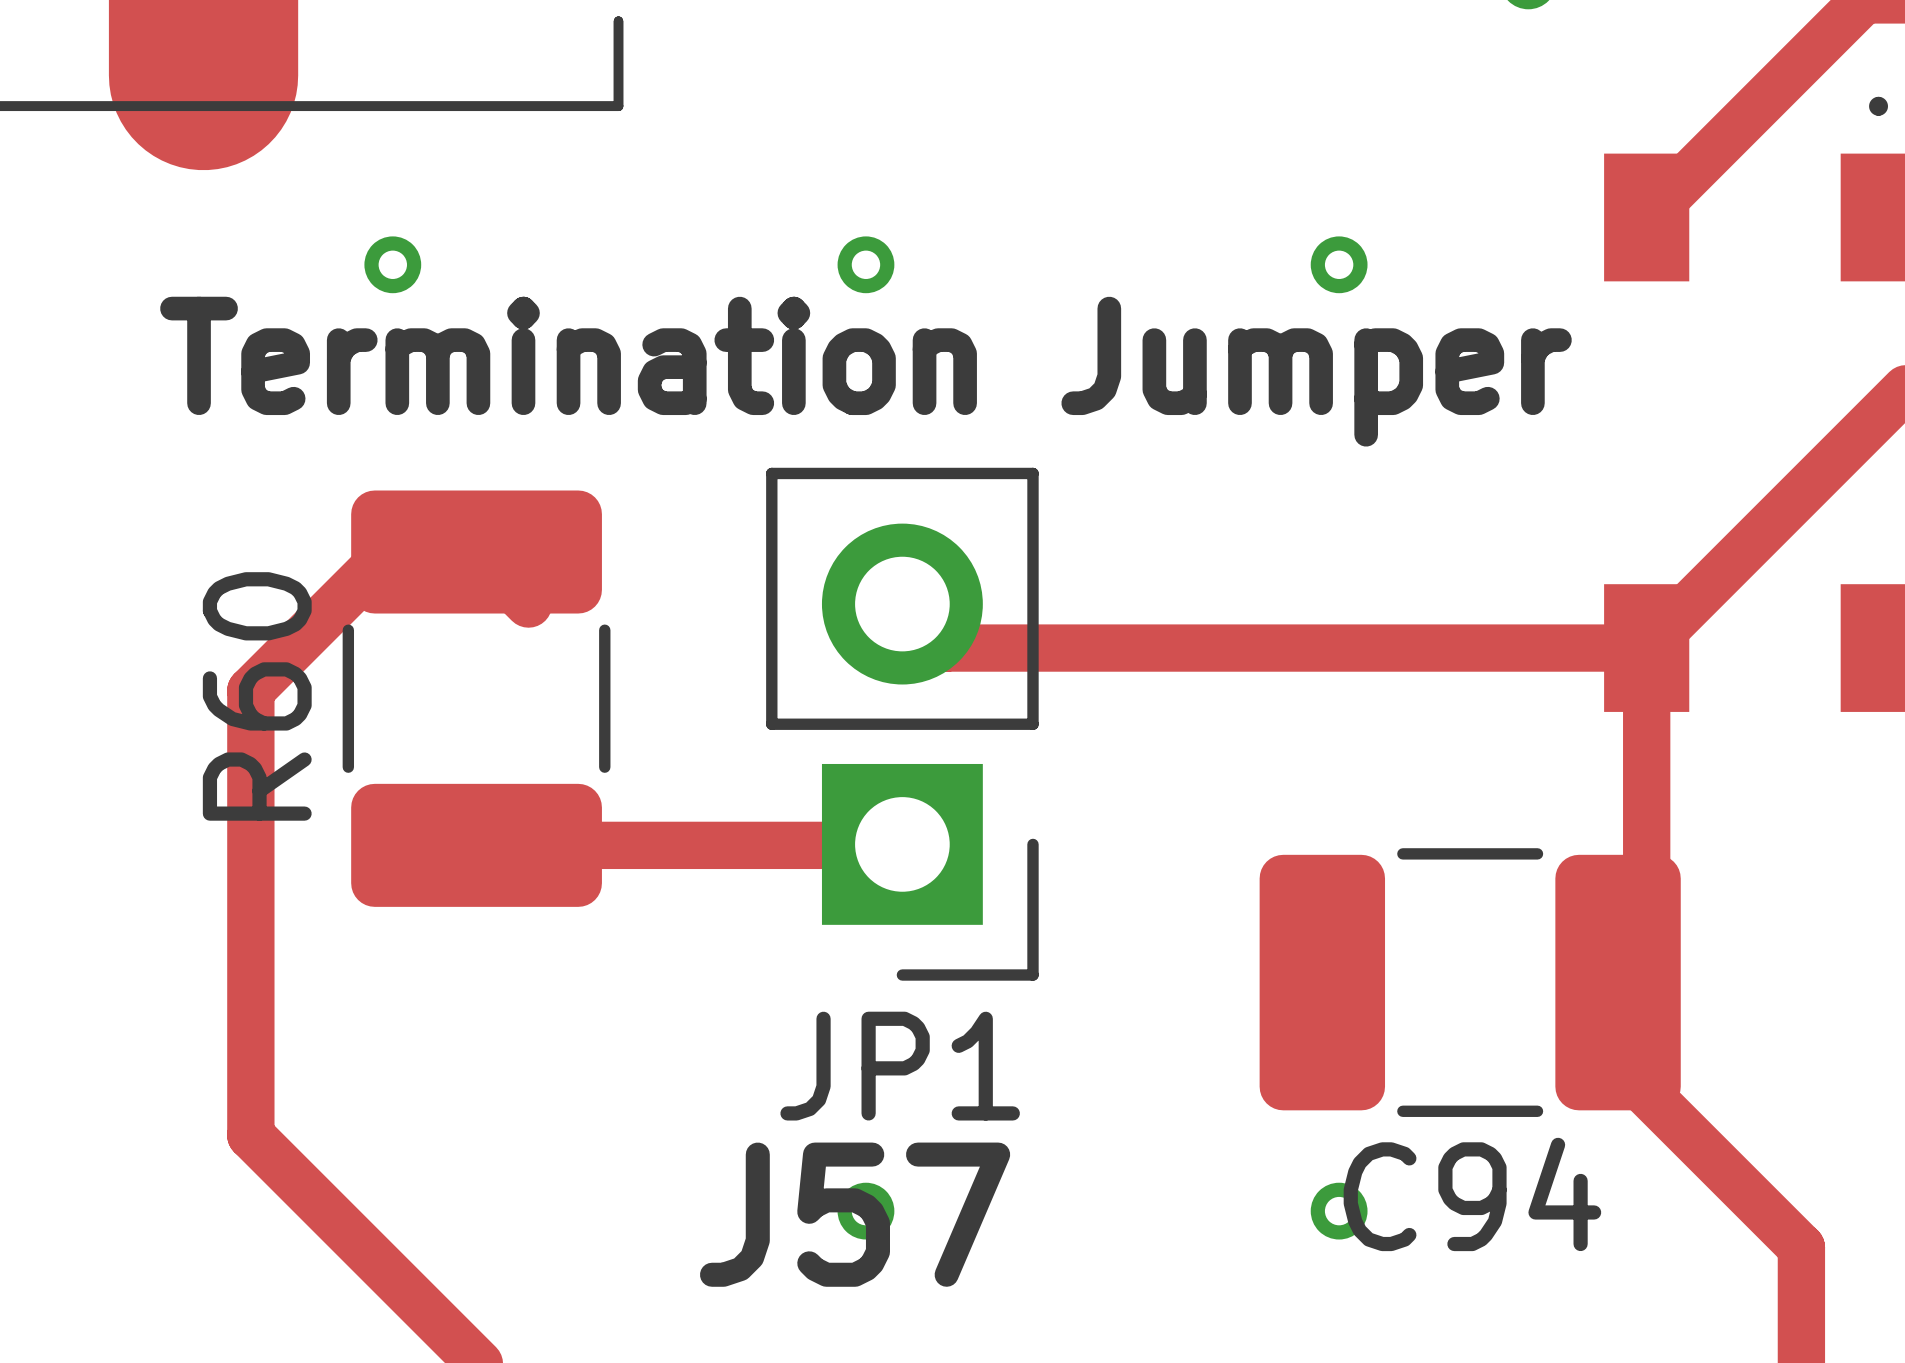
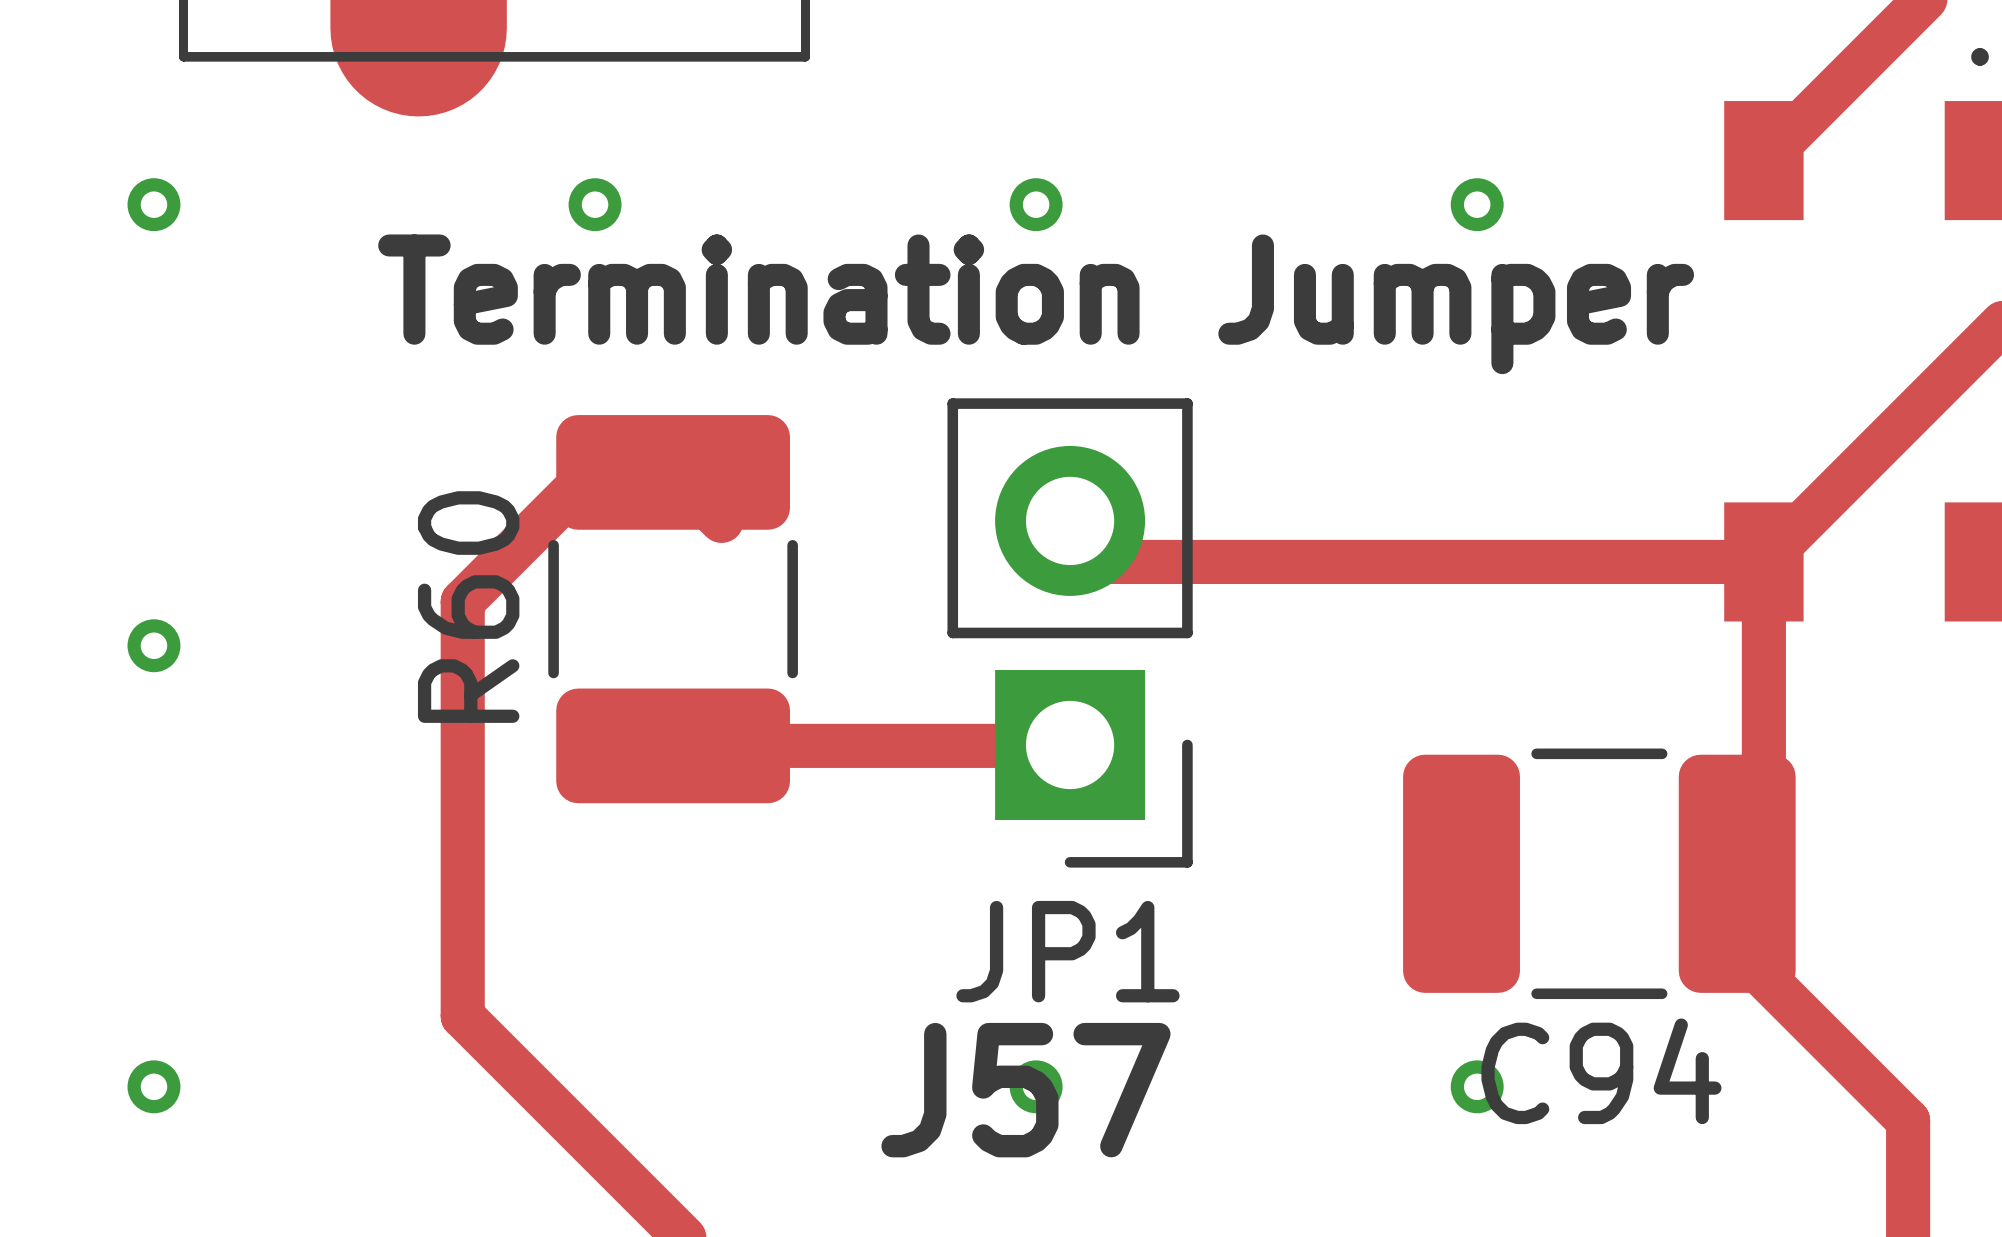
JP1 footprint: [766, 467, 1039, 981] -> [947, 398, 1193, 868]

